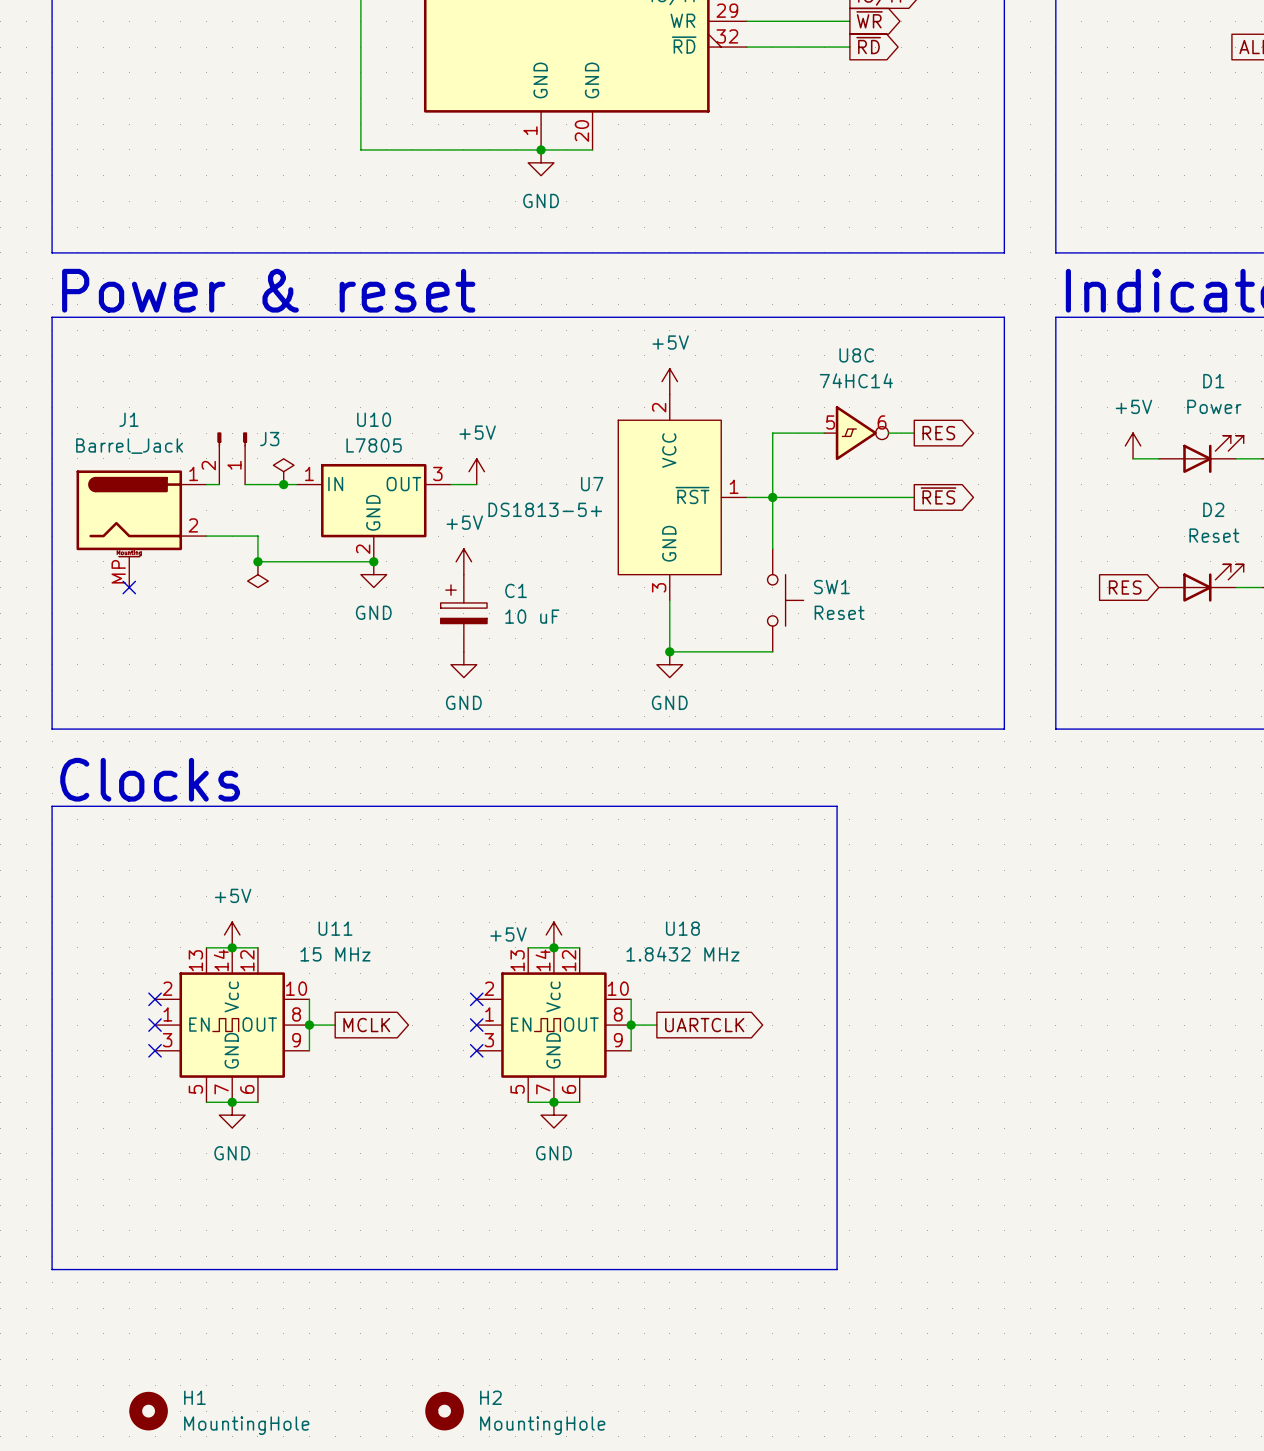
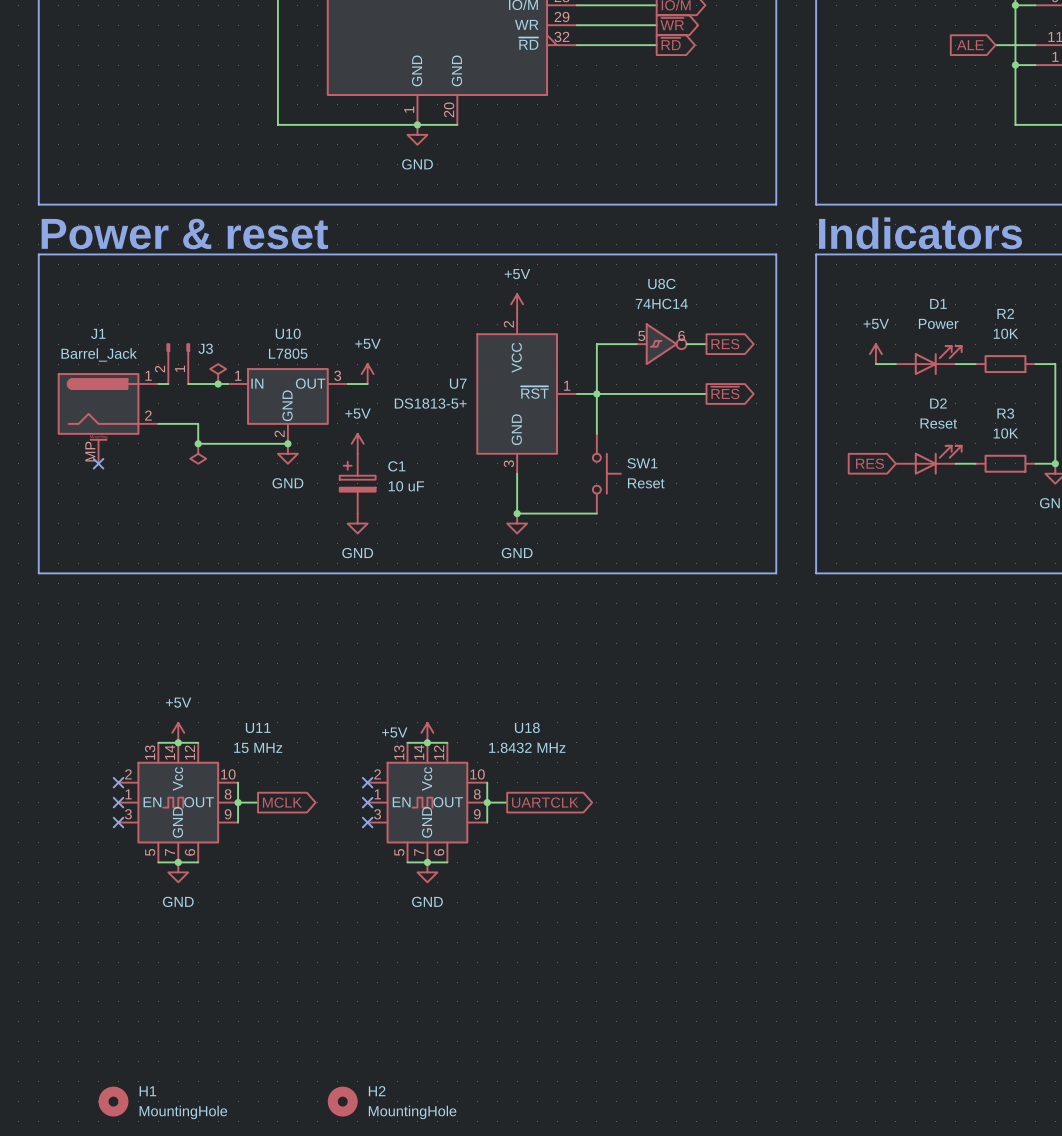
text: Clocks (150, 779) -> none
line: (52, 806) (837, 806) (837, 1269) (52, 1269) (52, 806) -> none

